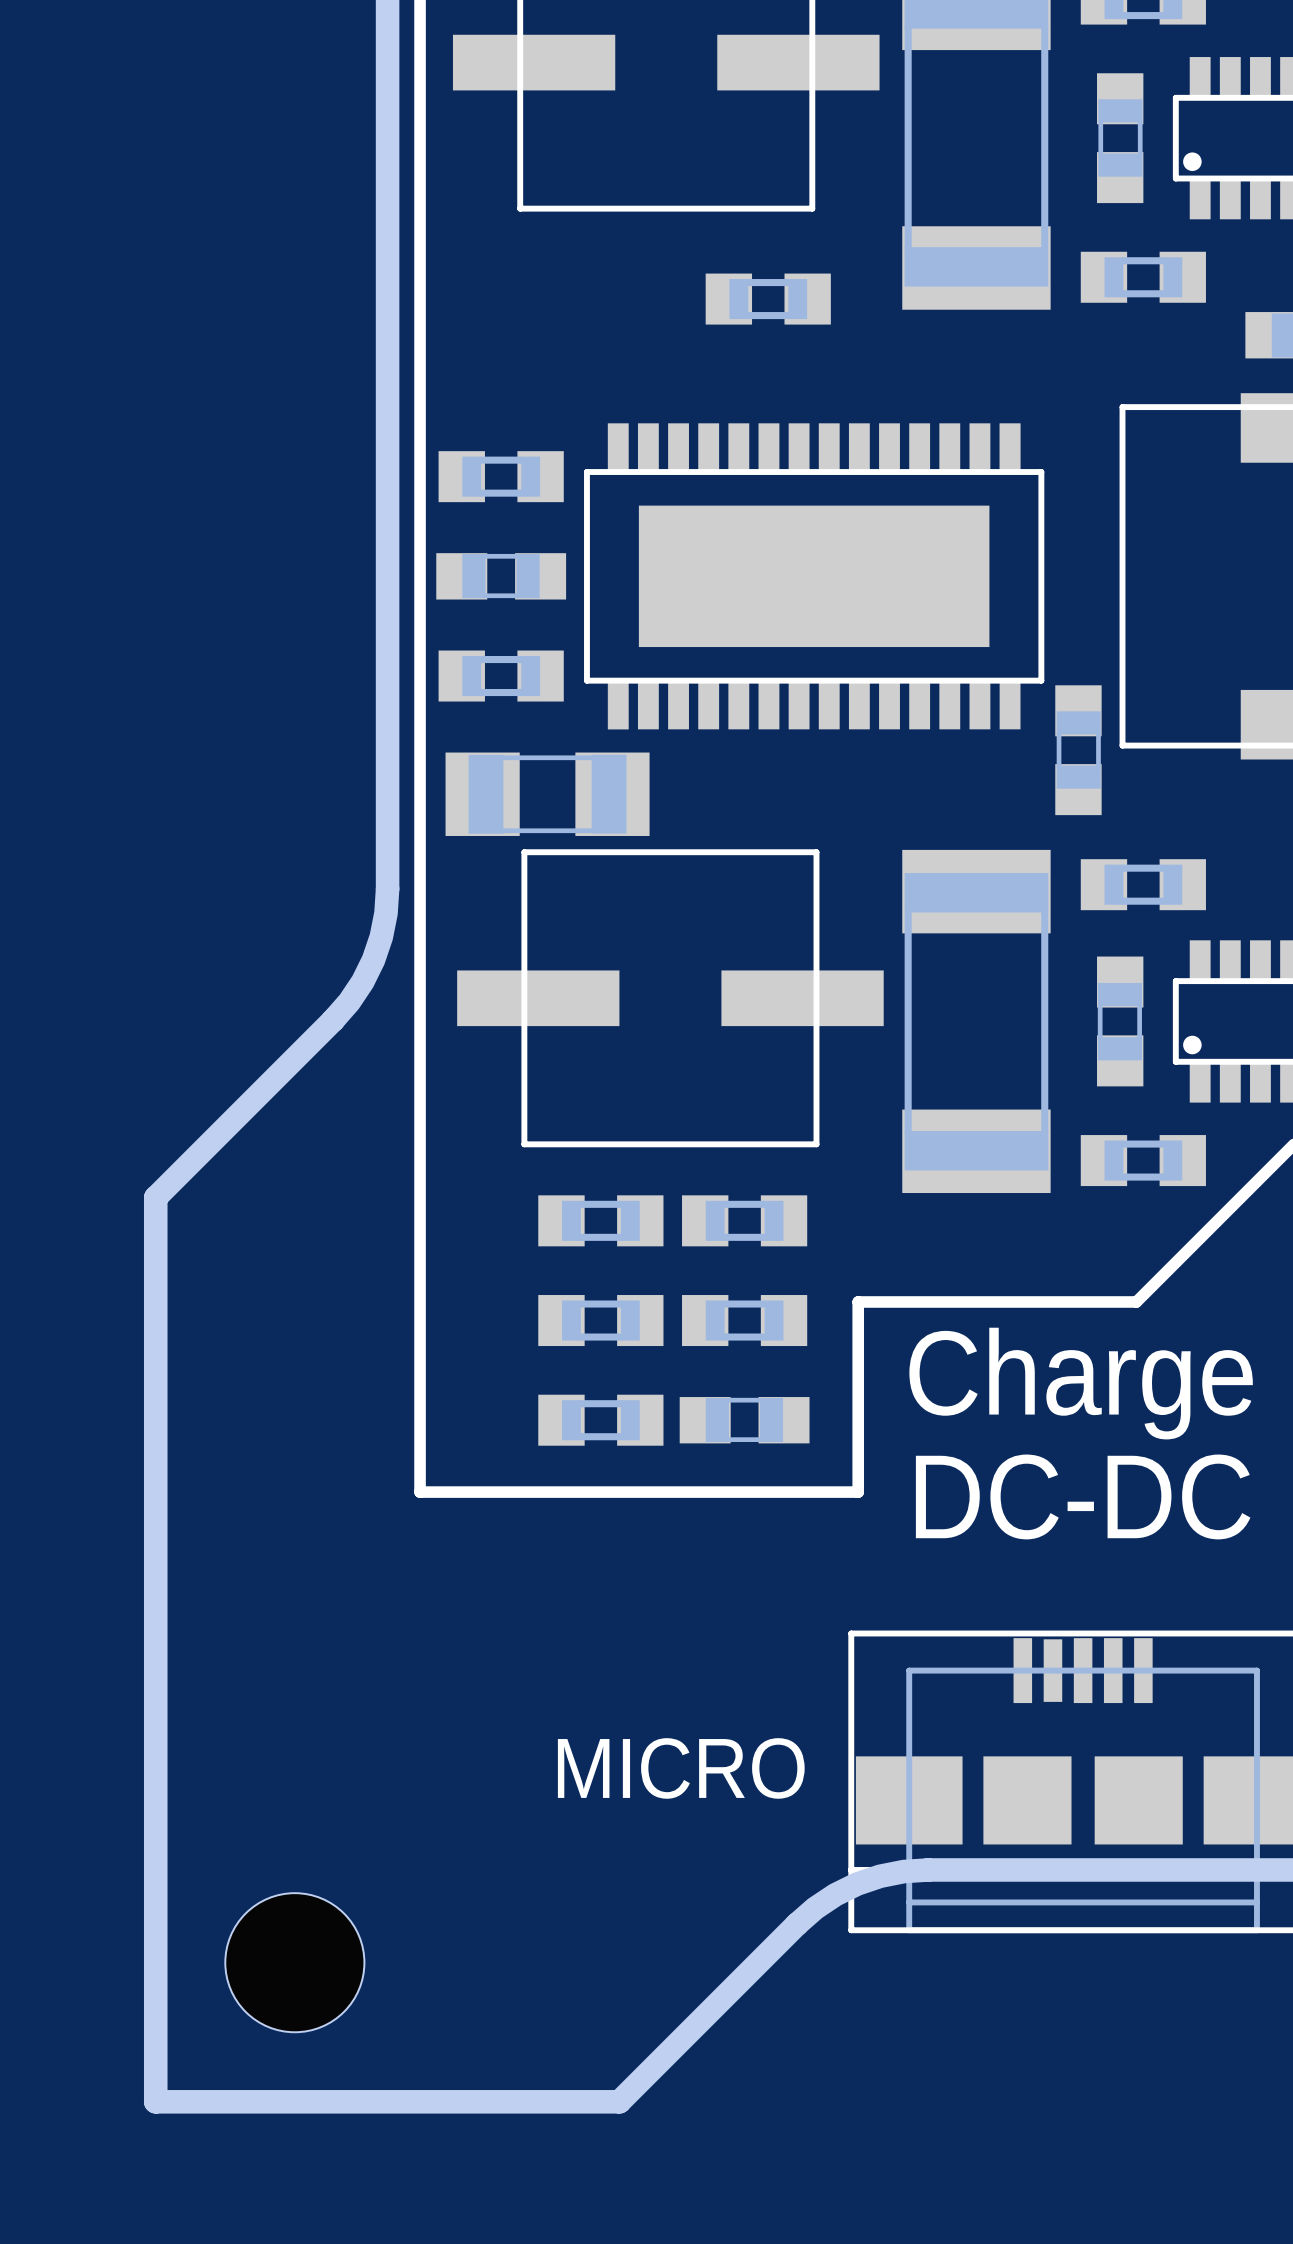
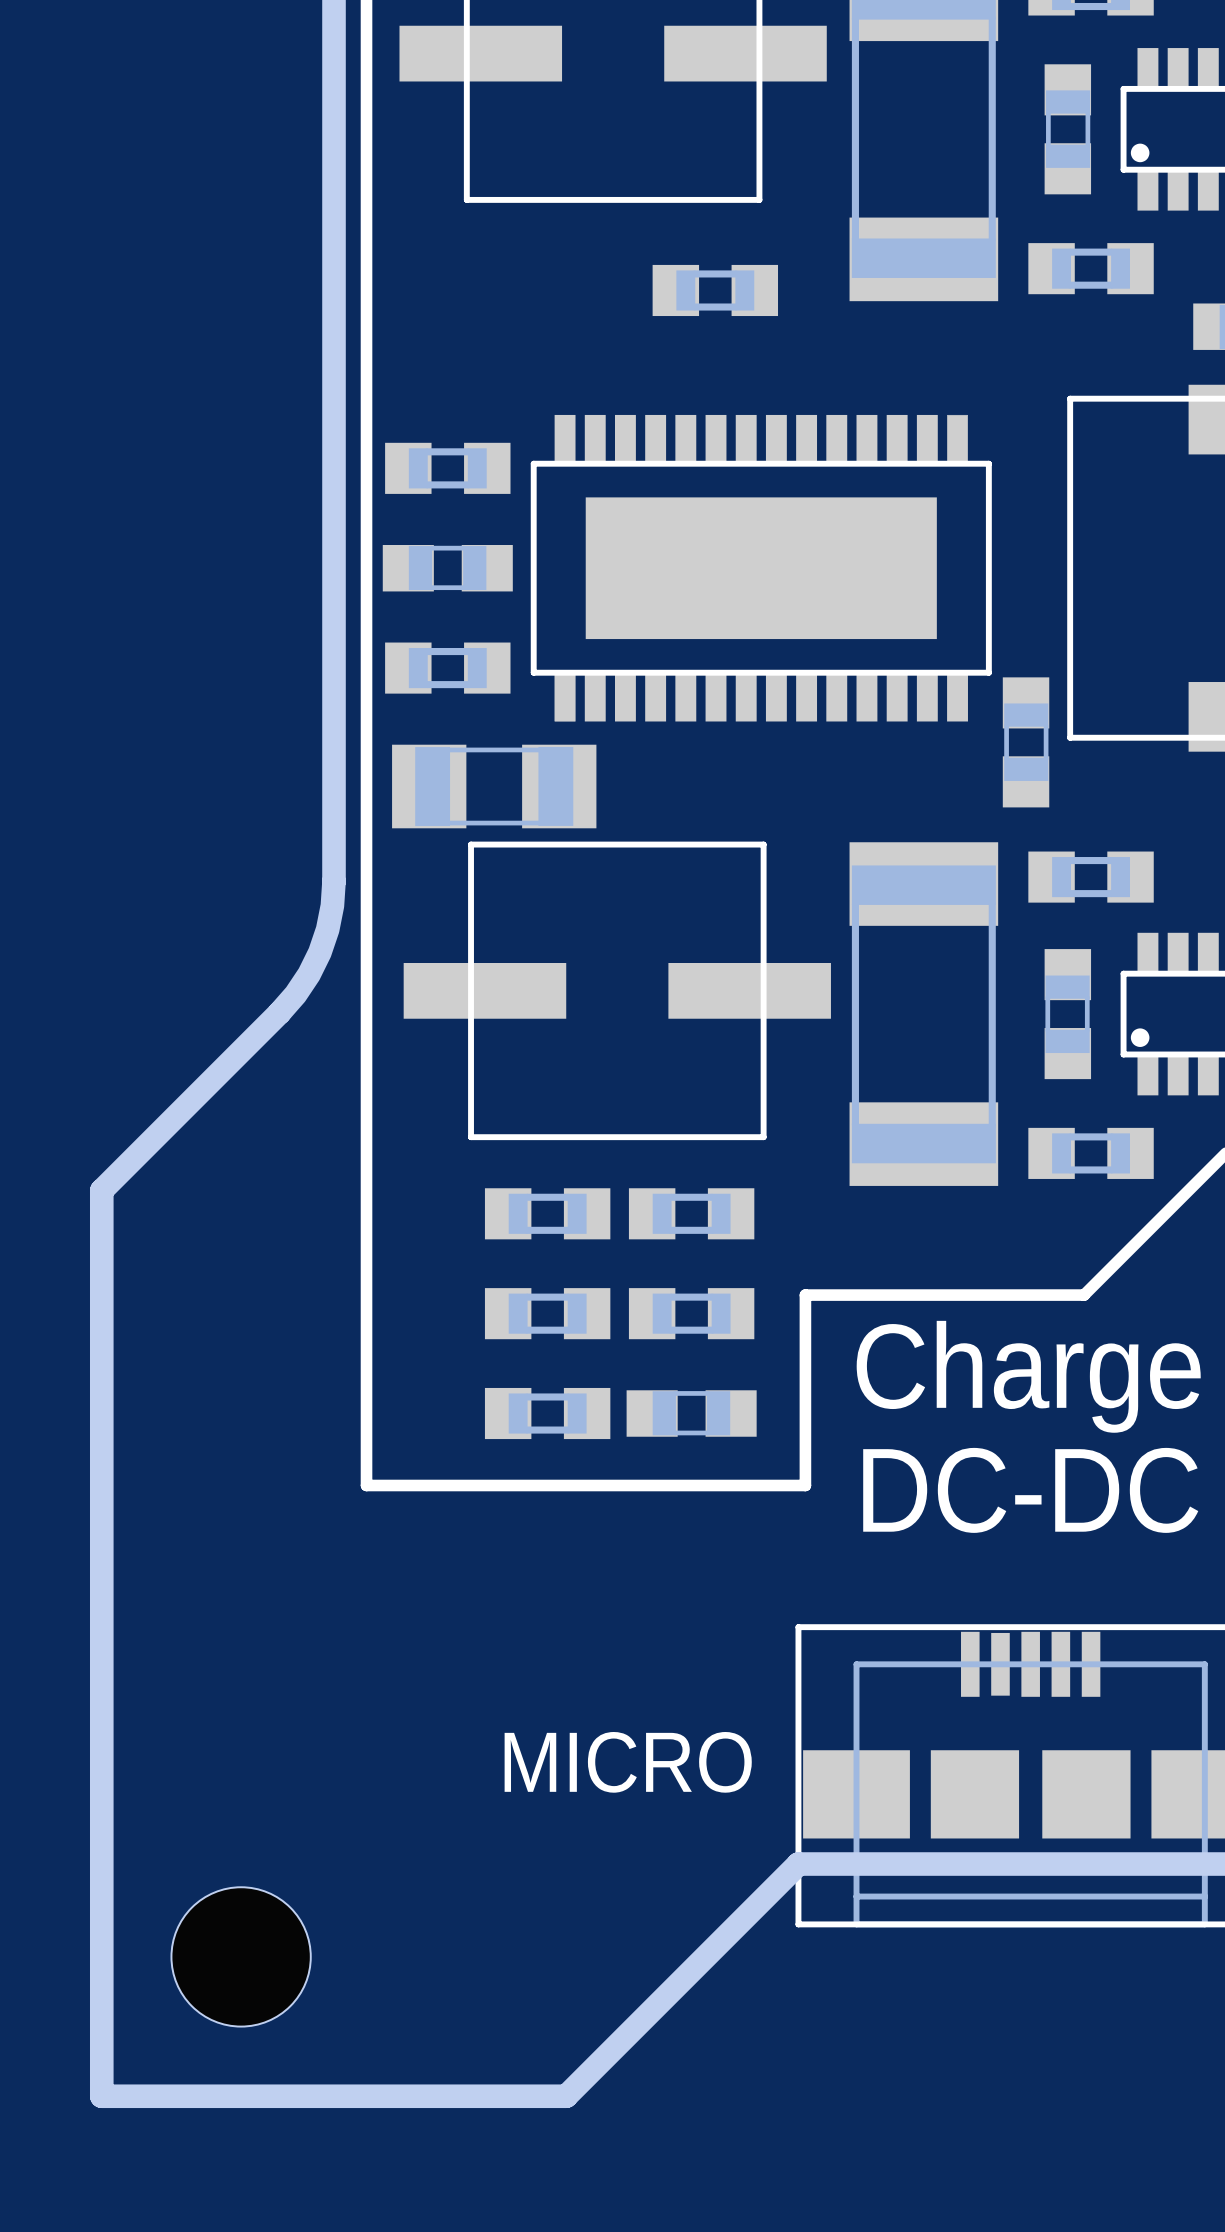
board edge: (928, 1869) (903, 1871) (880, 1876) (857, 1884) (835, 1894) (815, 1908) (796, 1924) -> (875, 1864) (798, 1864) (744, 1918)

